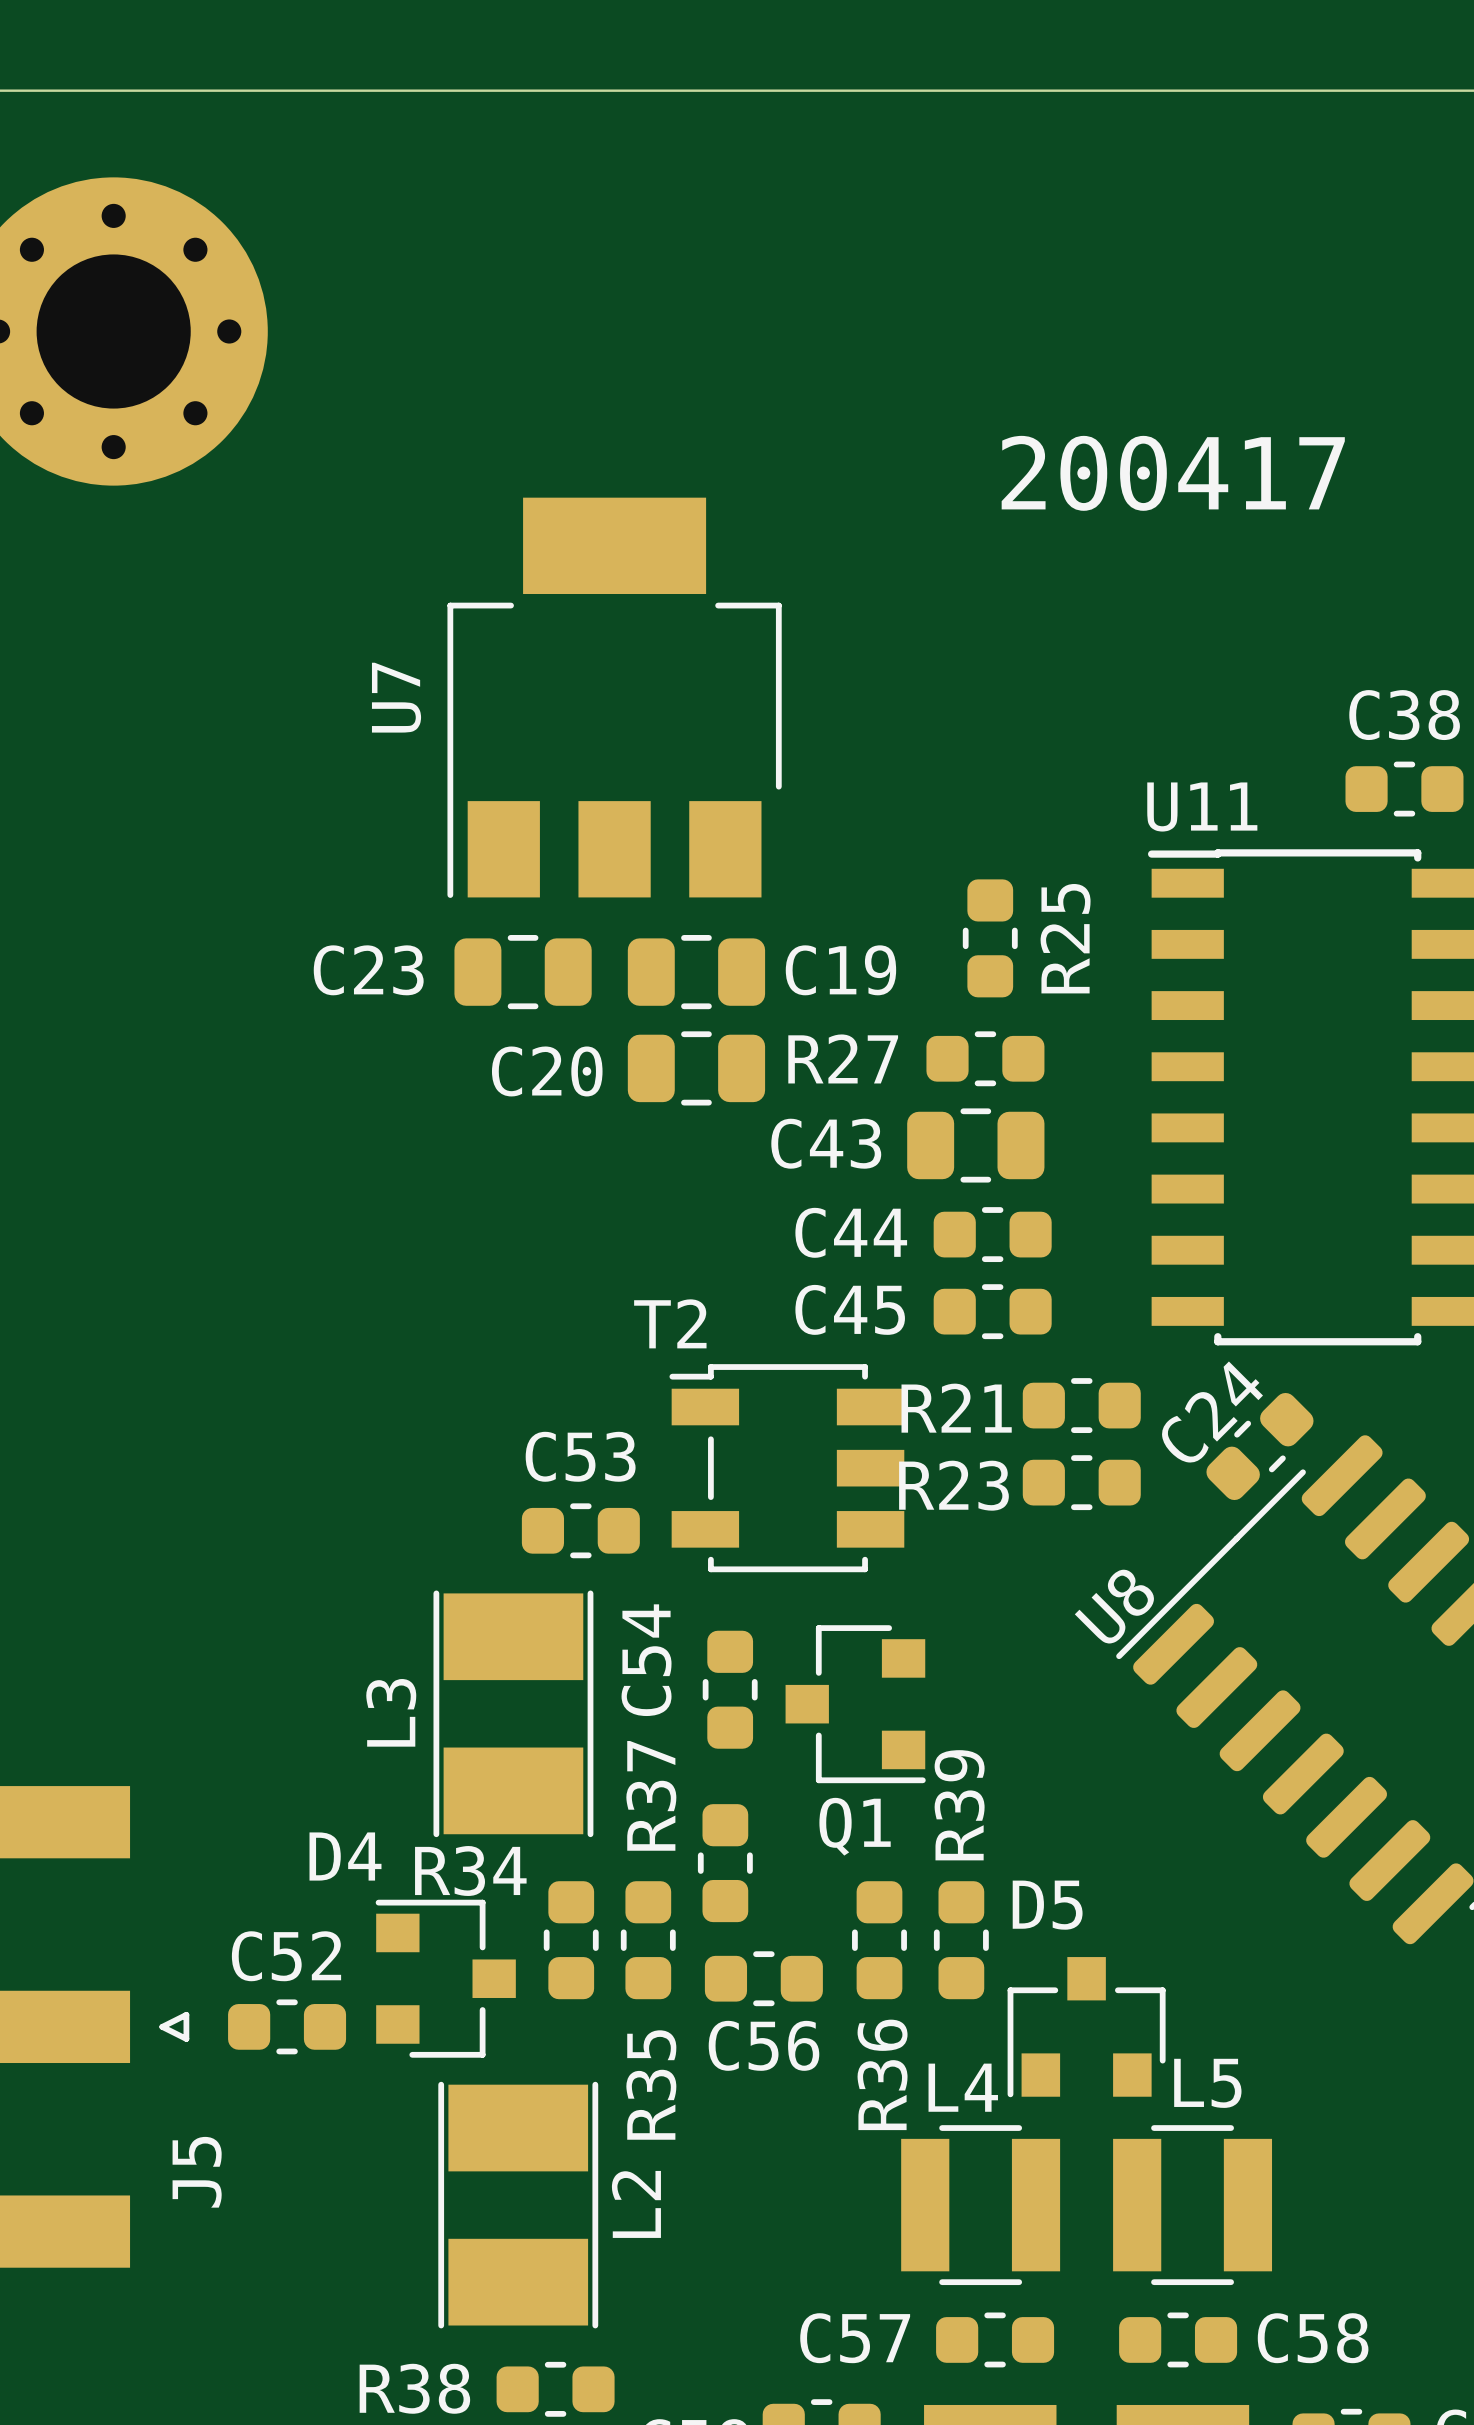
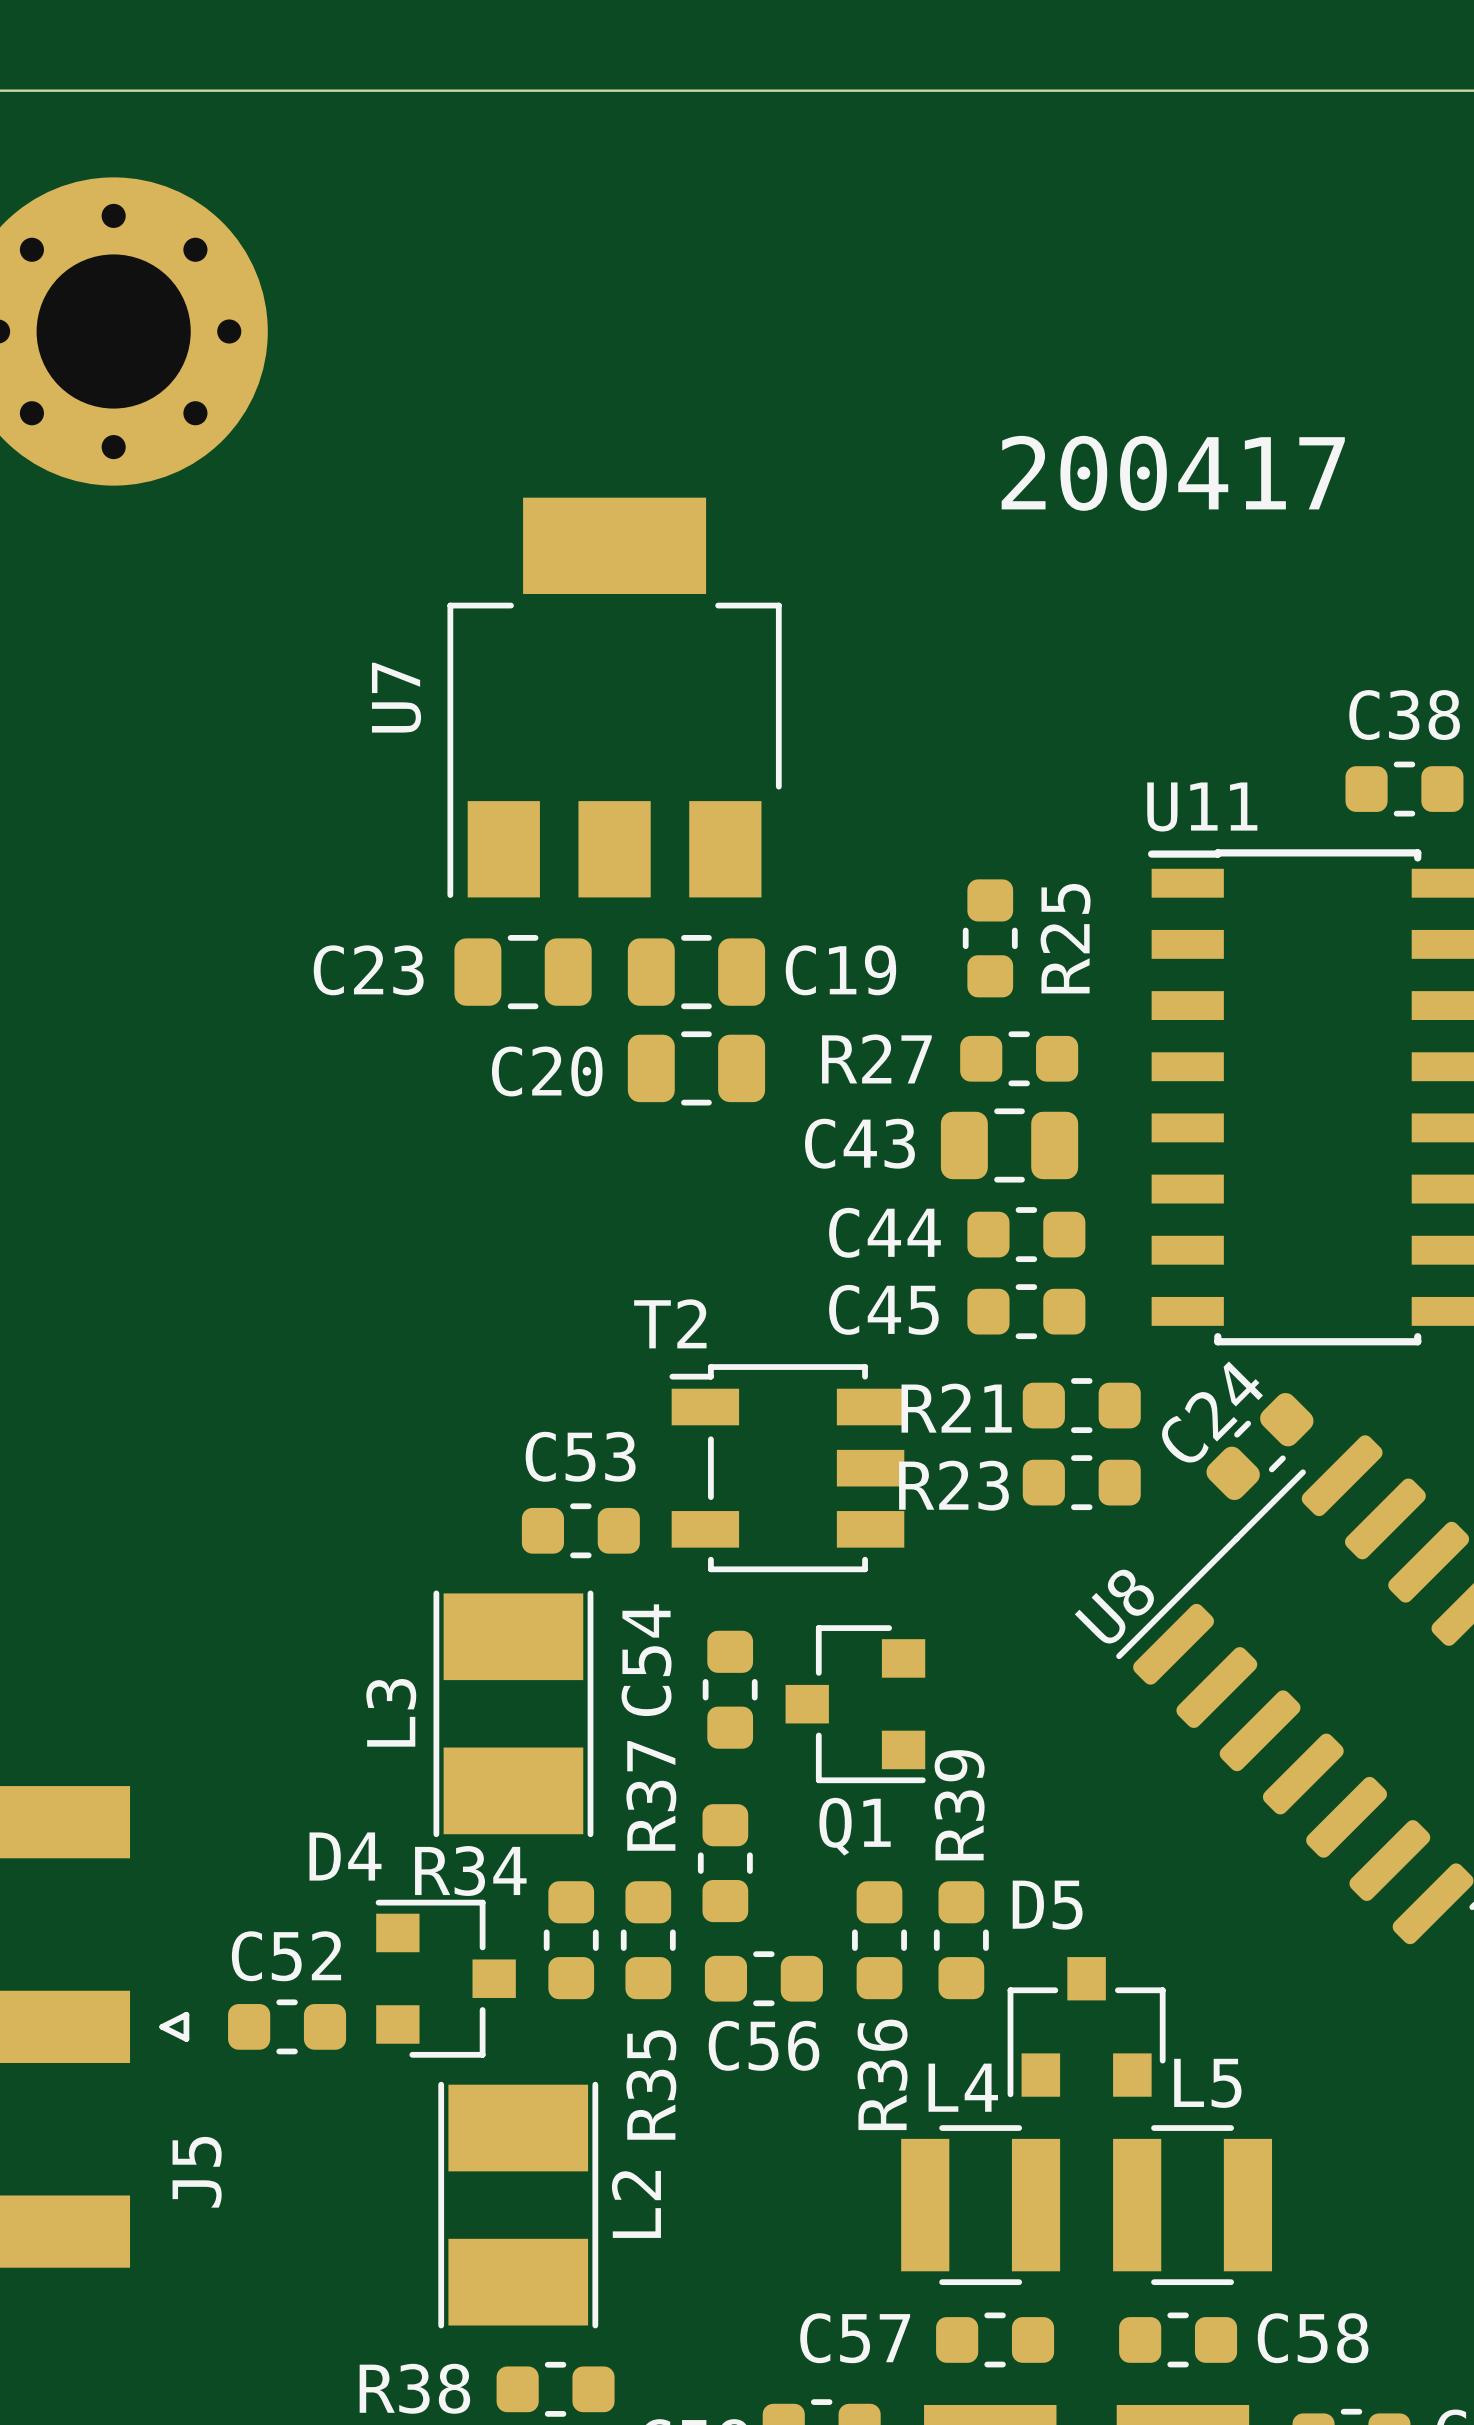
R27 position: (985, 1058) -> (1019, 1058)
C43 position: (975, 1145) -> (1009, 1145)
C44 position: (992, 1234) -> (1026, 1234)
C45 position: (992, 1311) -> (1026, 1311)

